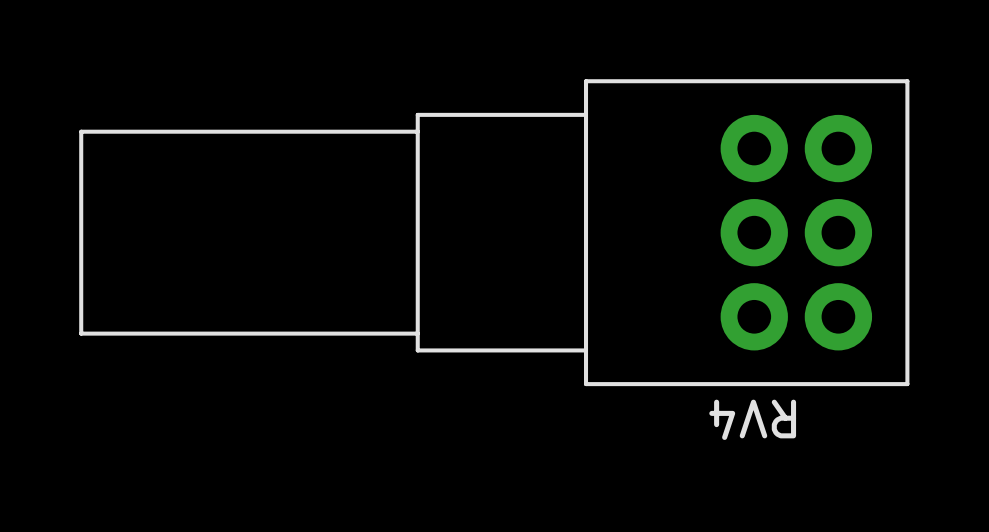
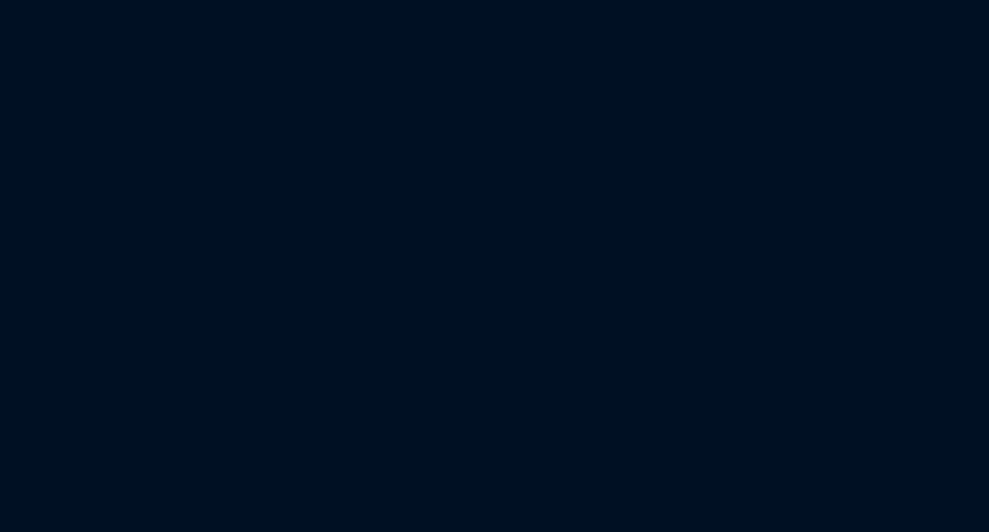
RV4: (494, 232) -> none

